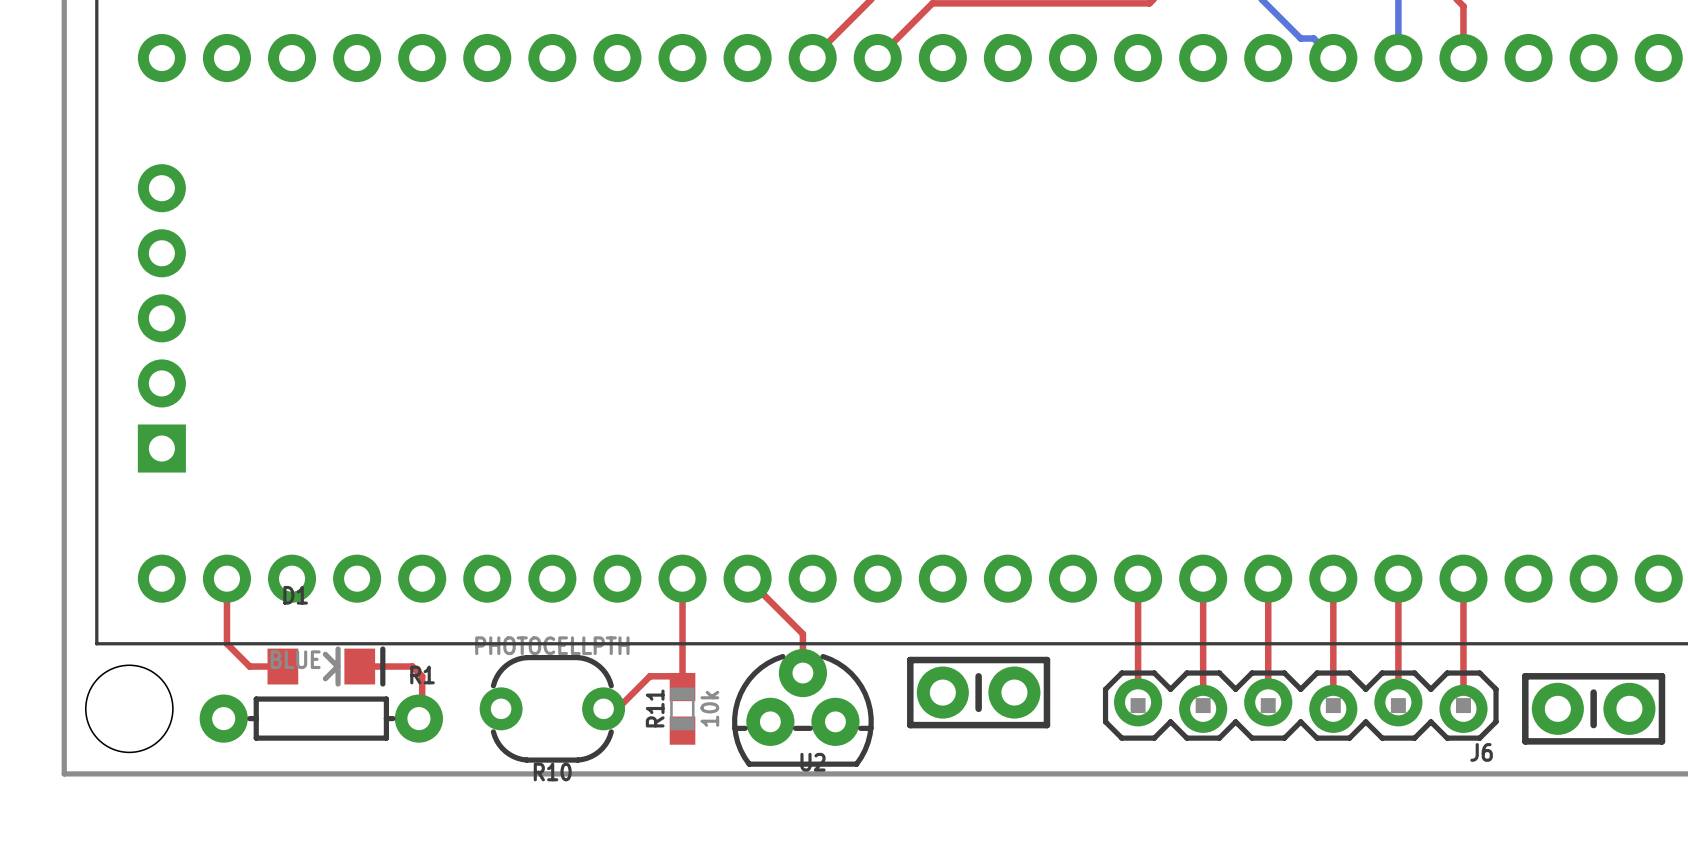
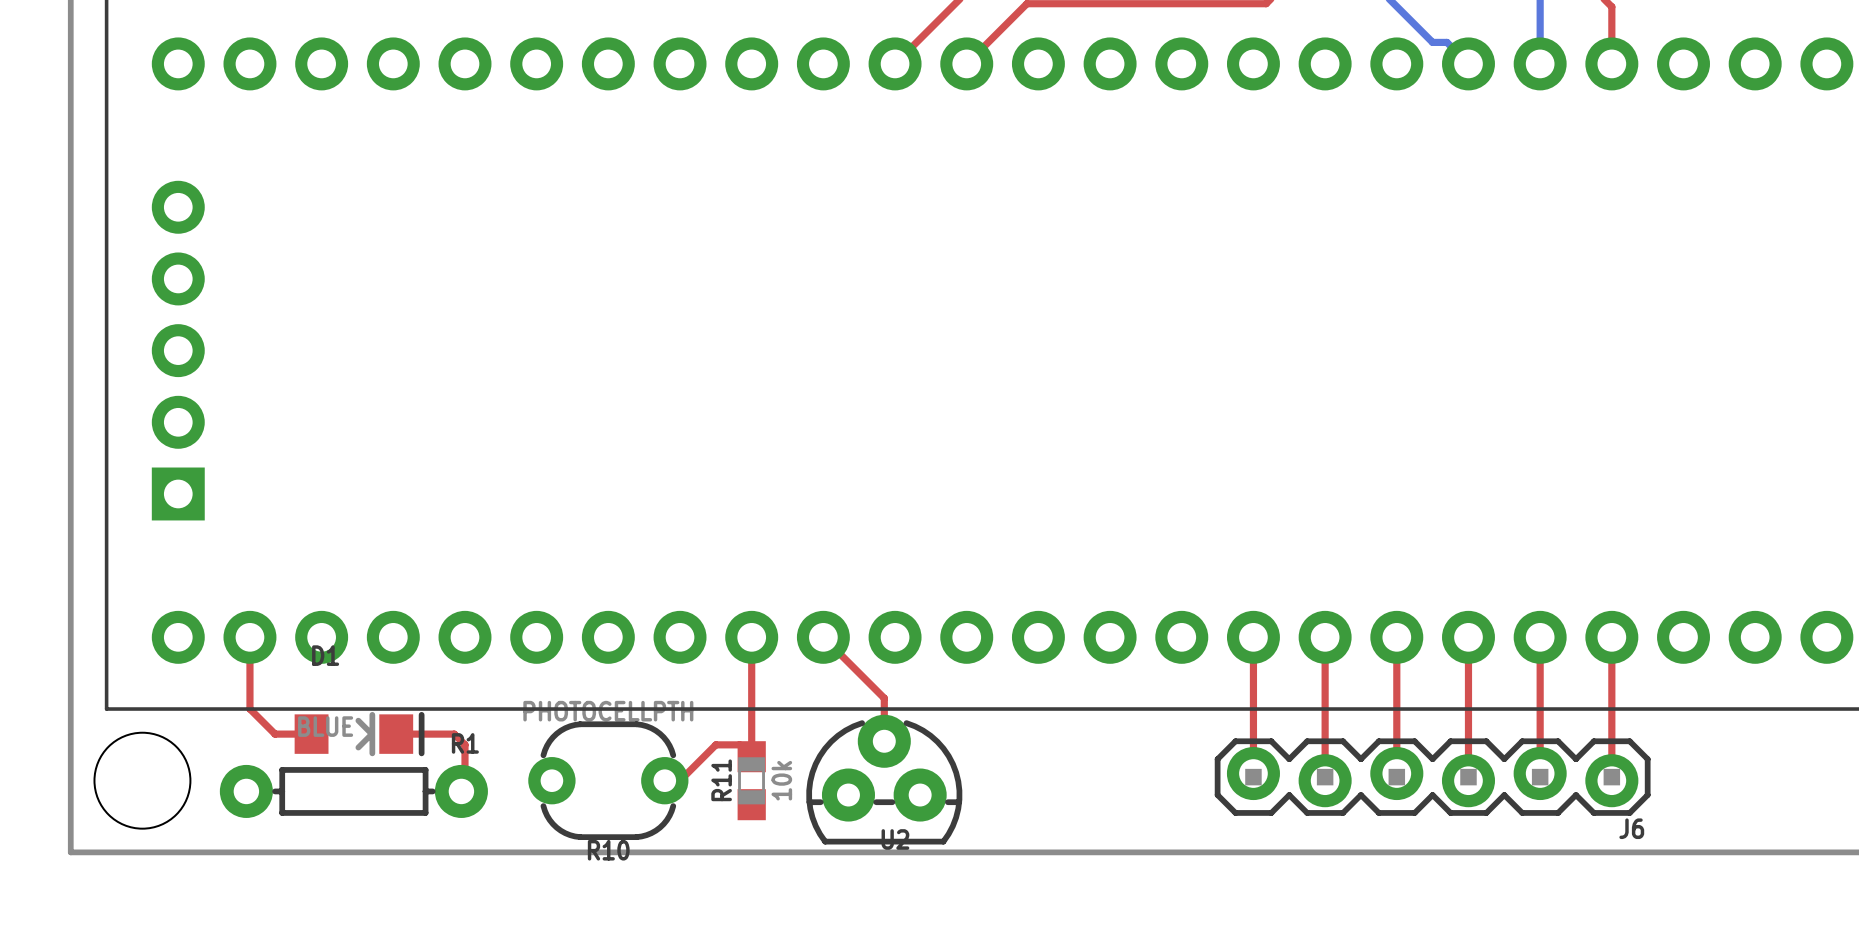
part: (978, 692) -> none
part: (1593, 708) -> none

